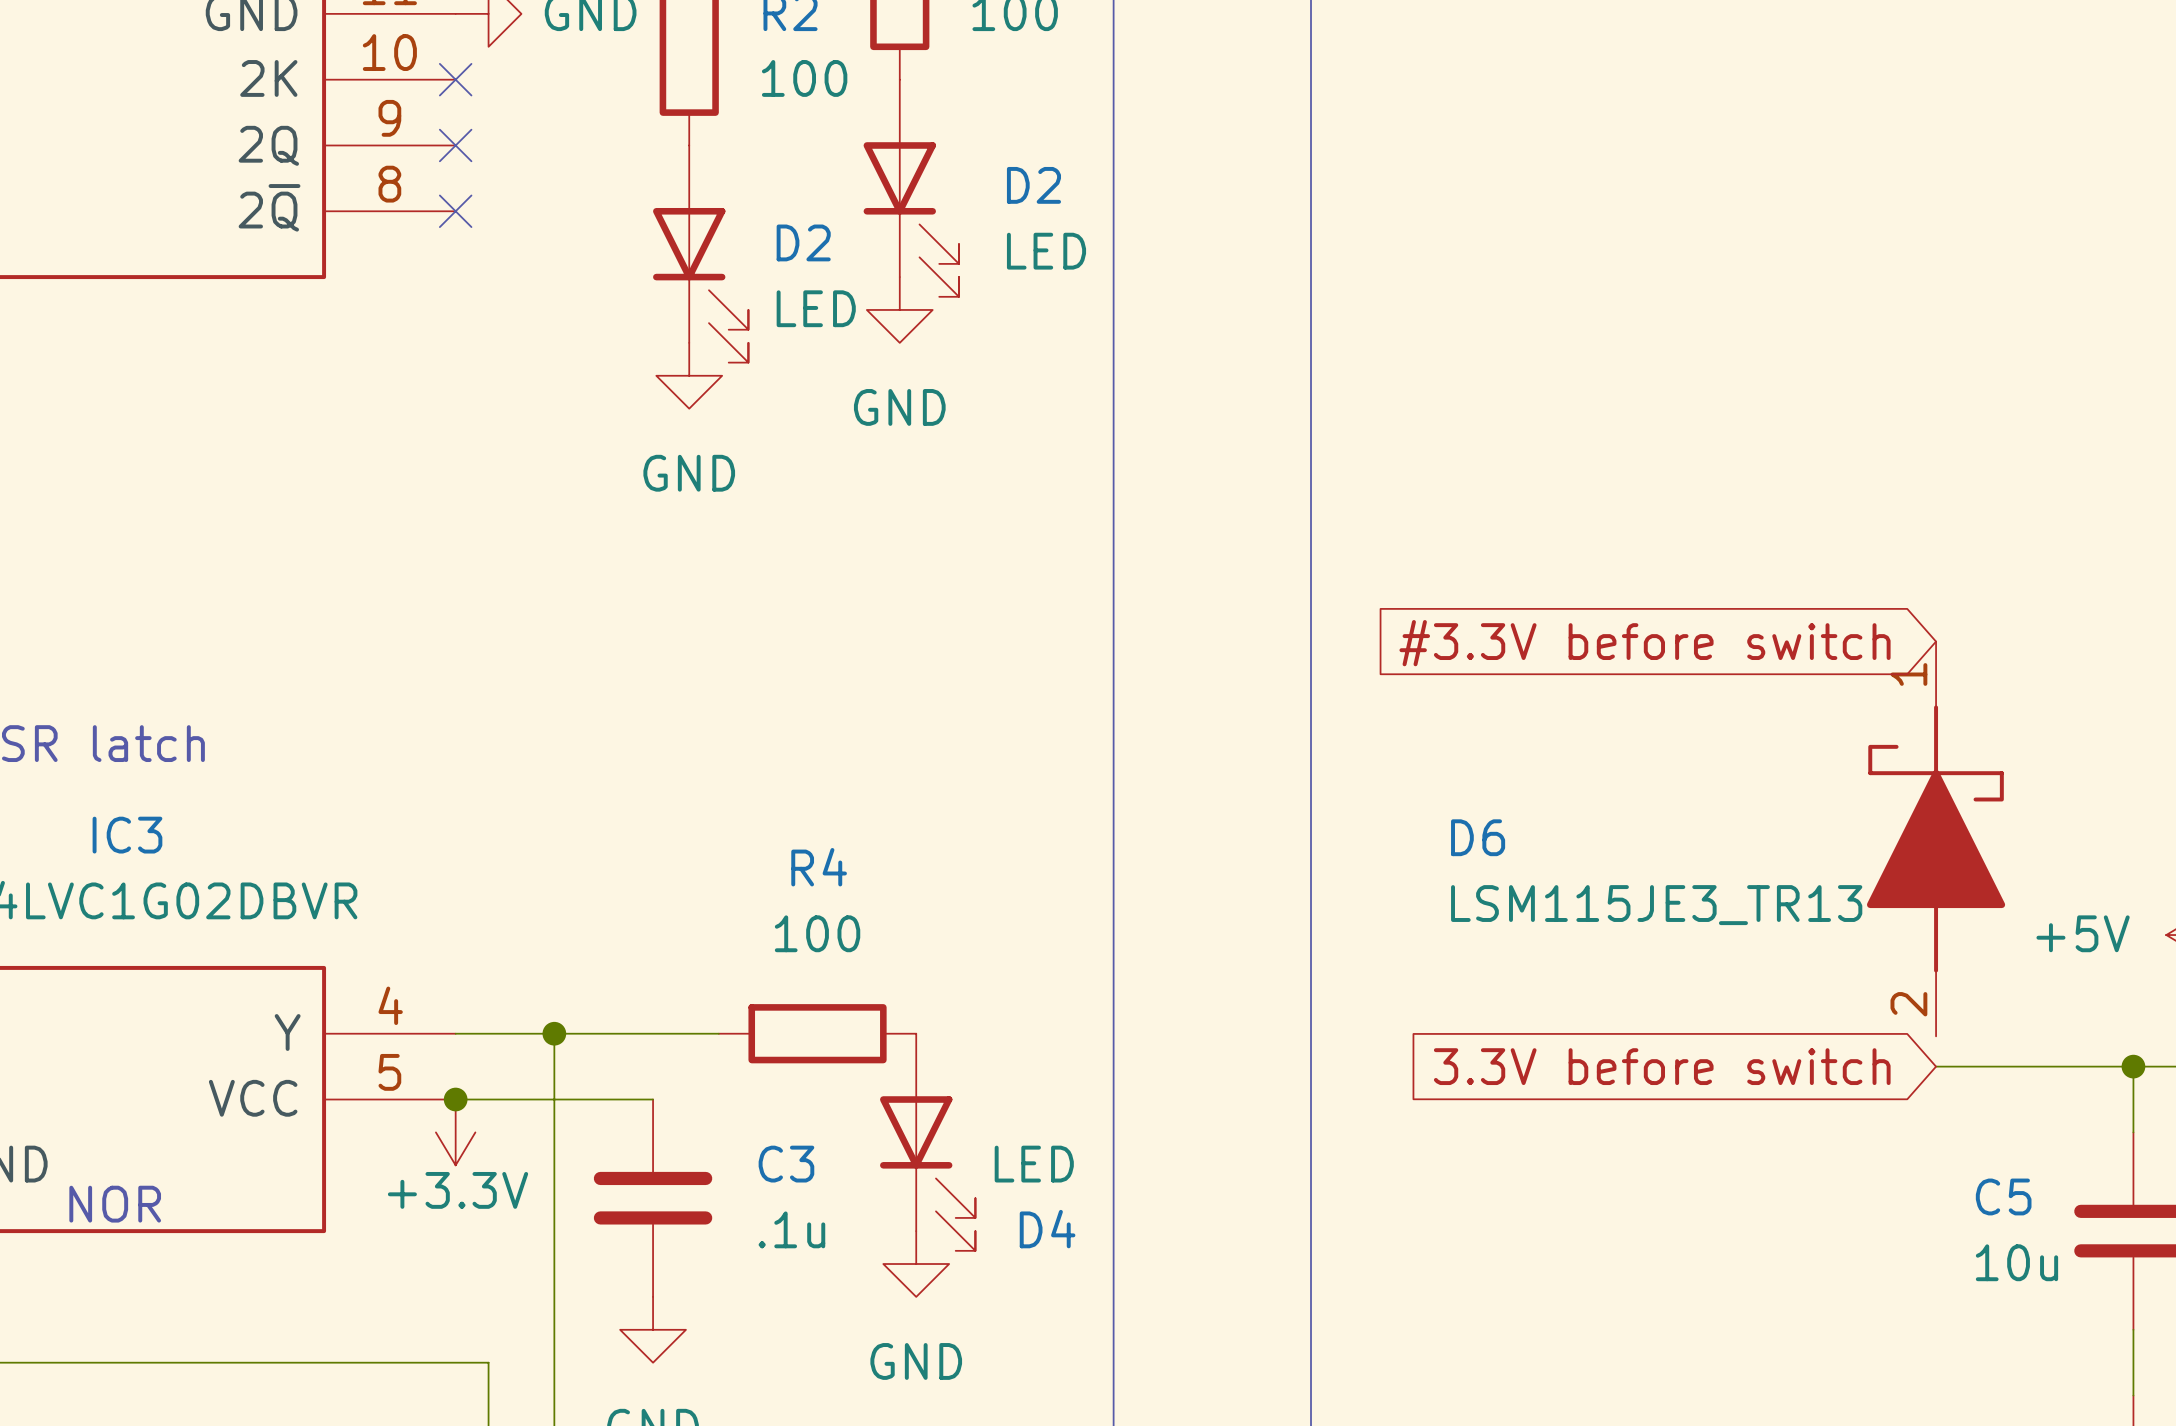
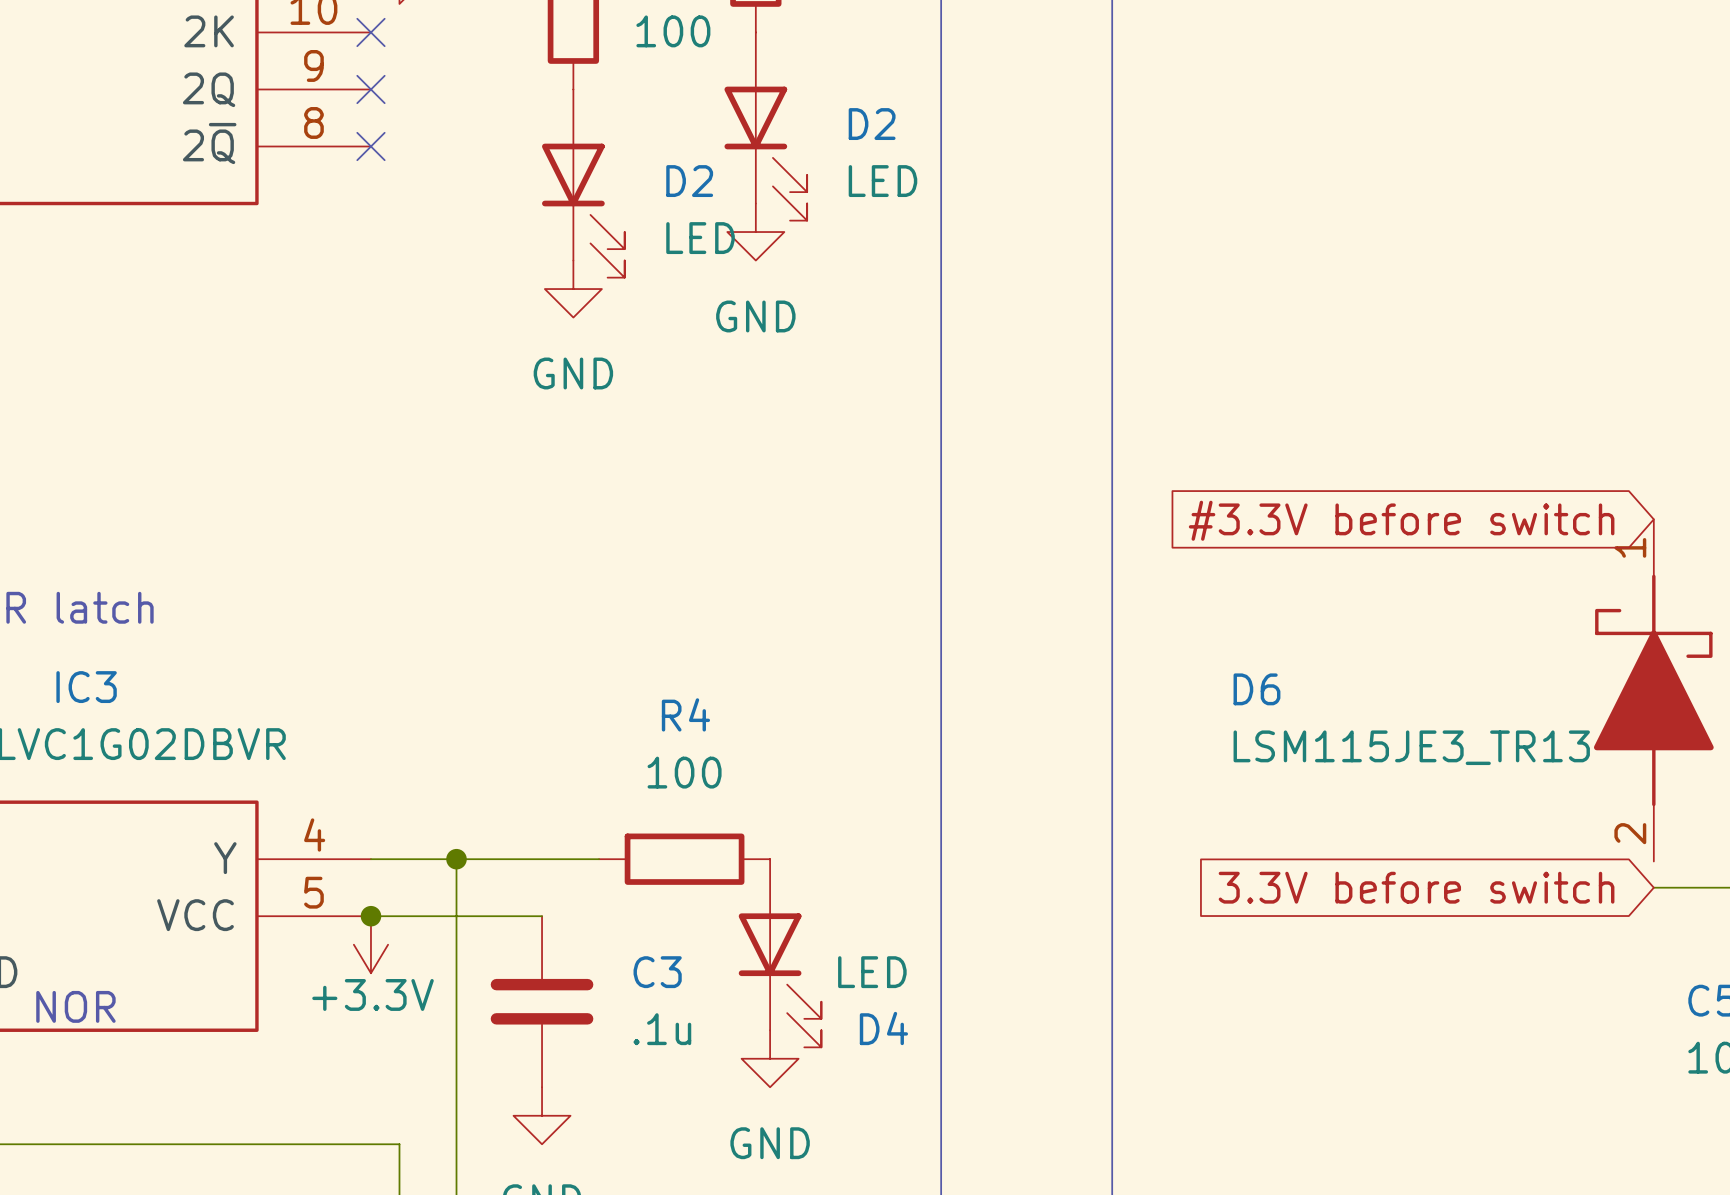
D2 name position: D2 (803, 242) -> D2 (689, 181)
D2 value position: LED (816, 308) -> LED (700, 238)

